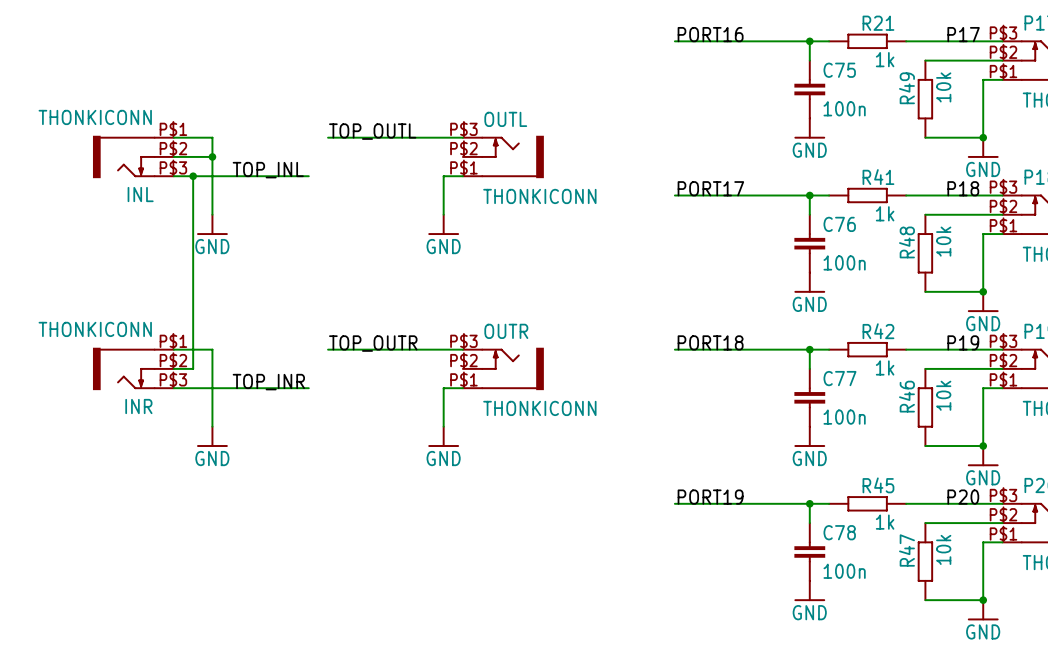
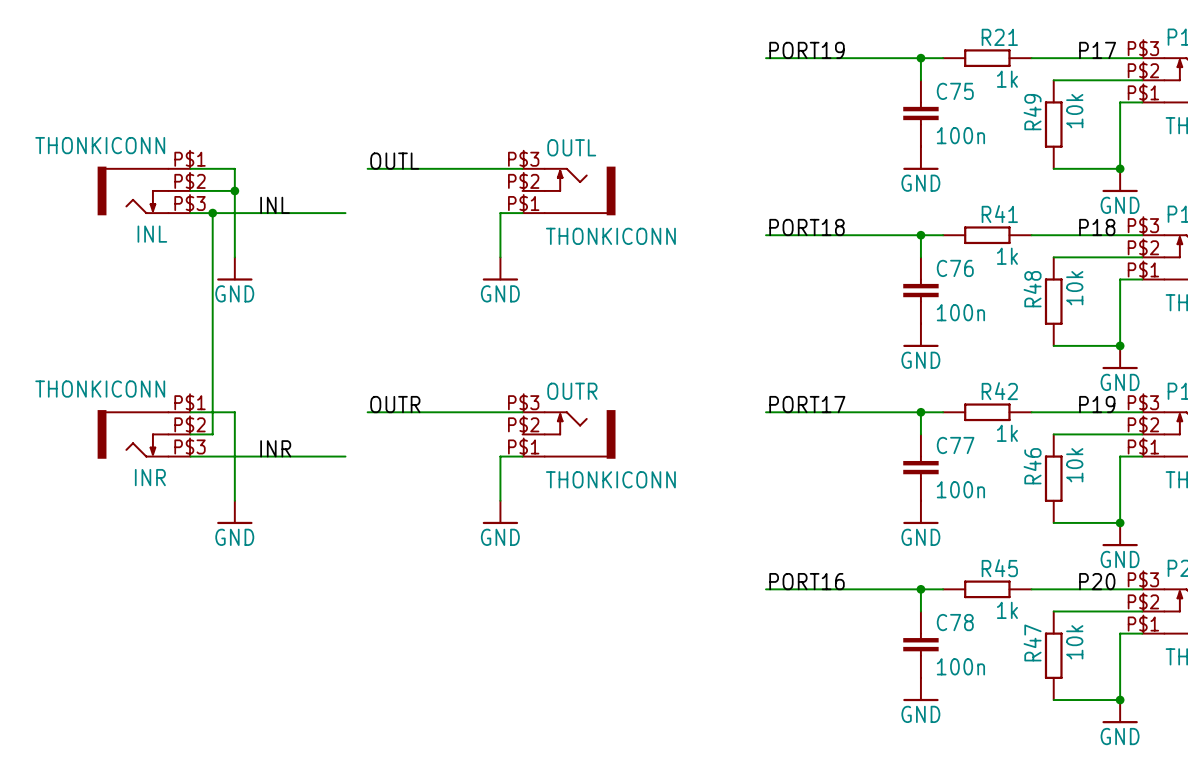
label: PORT16 (710, 34) -> PORT19 (807, 50)
label: TOP_OUTL (372, 131) -> OUTL (394, 161)
label: TOP_INL (268, 170) -> INL (275, 205)
label: PORT17 (710, 188) -> PORT18 (807, 227)
label: PORT18 (710, 342) -> PORT17 (807, 404)
label: TOP_OUTR (373, 343) -> OUTR (395, 404)
label: TOP_INR (268, 382) -> INR (275, 448)
label: PORT19 (710, 497) -> PORT16 (807, 581)

